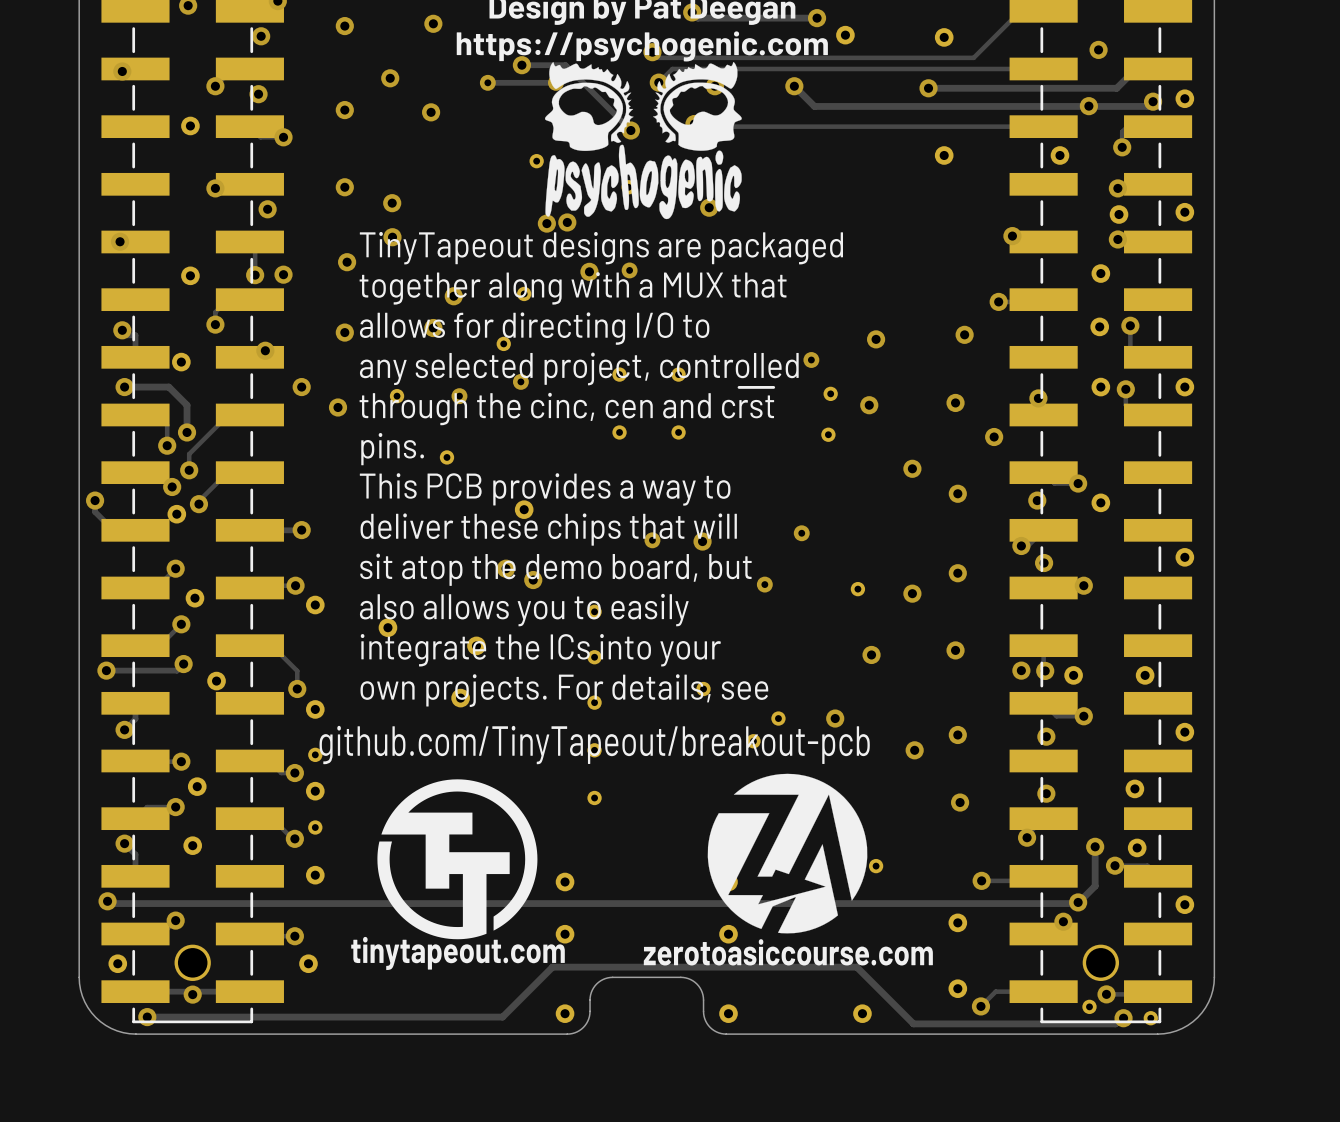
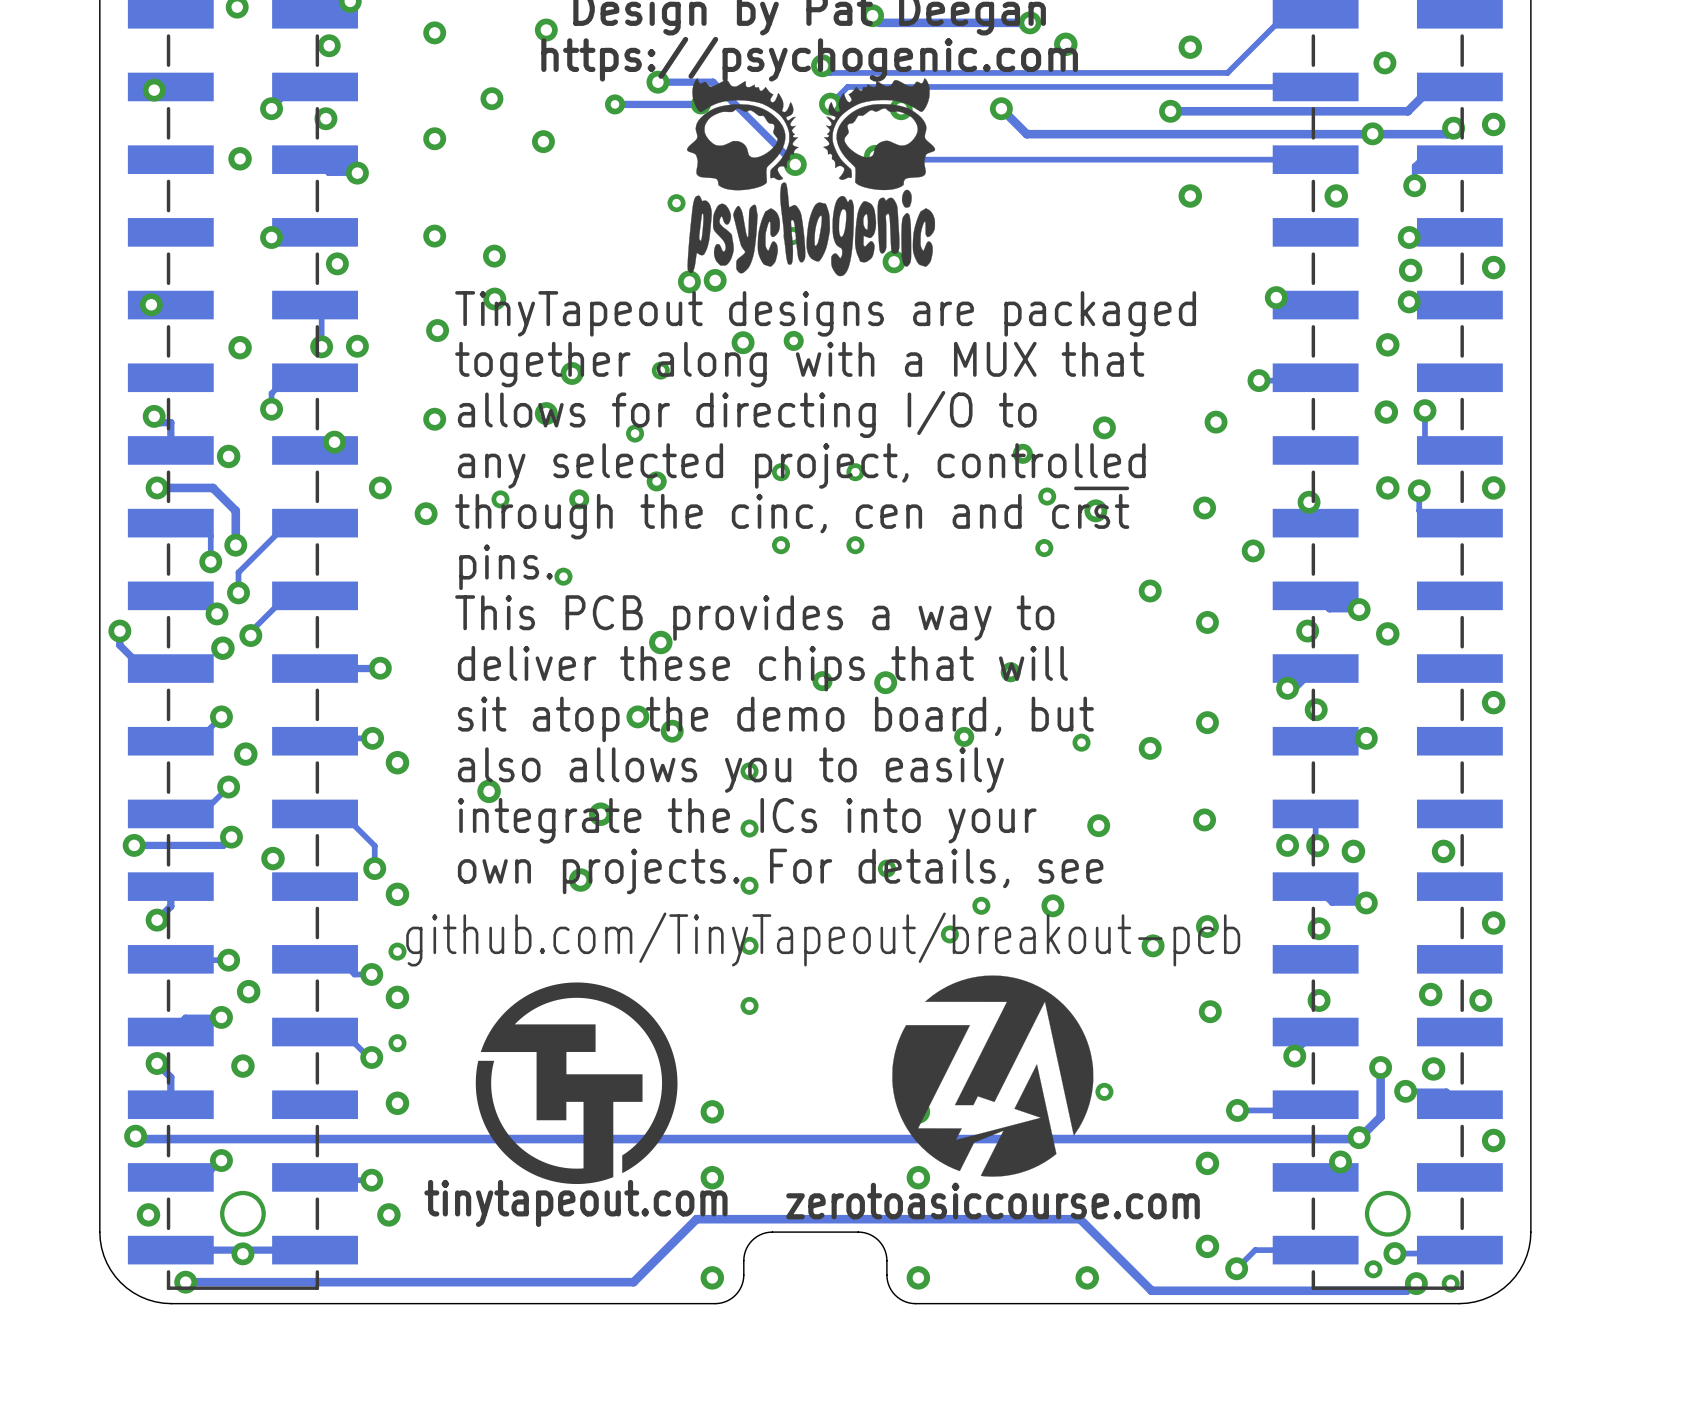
via: none -> (1480, 1000)

